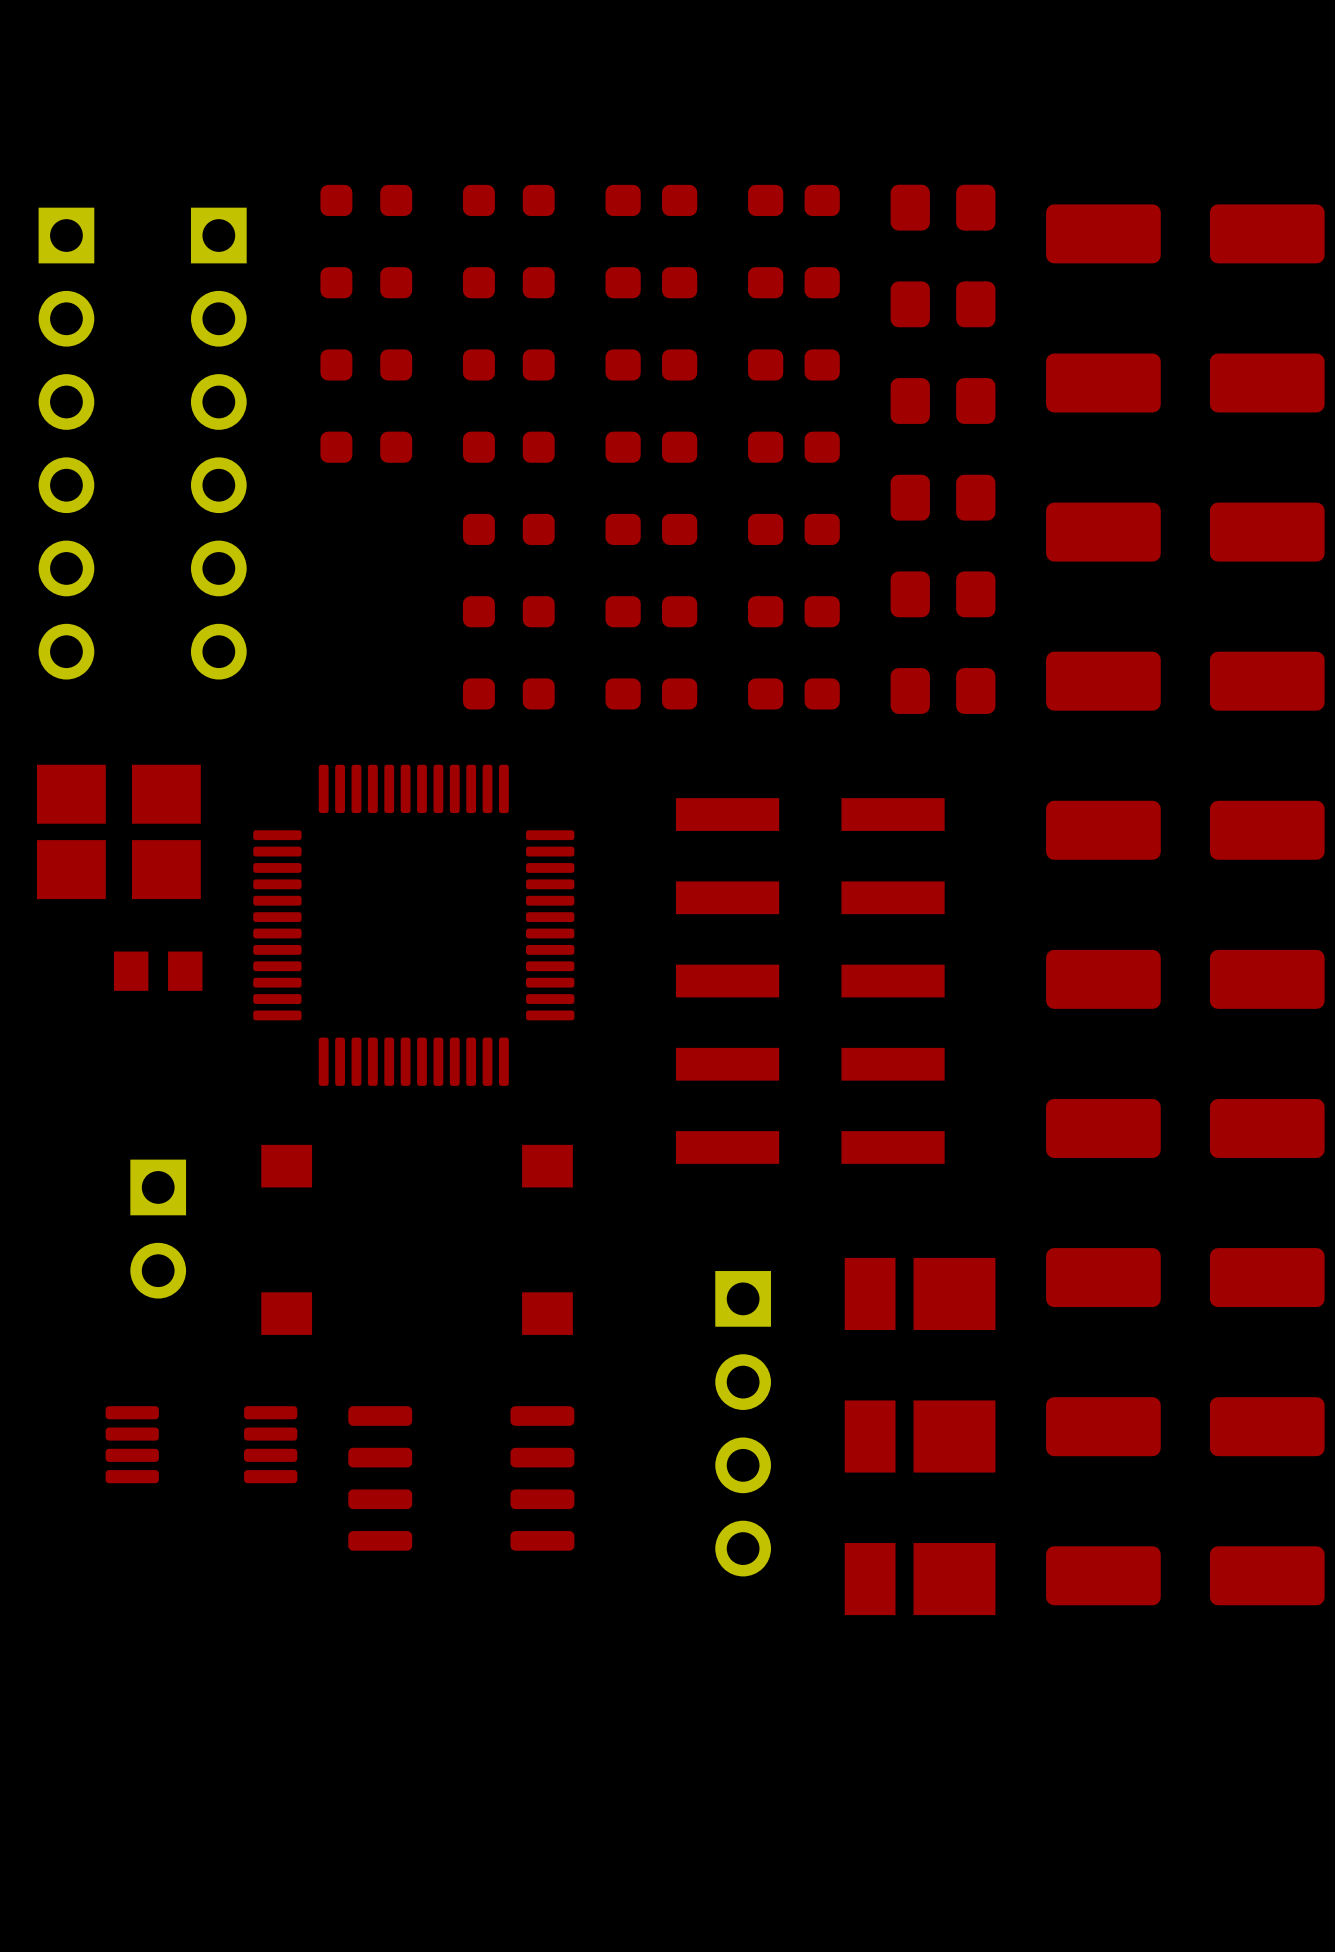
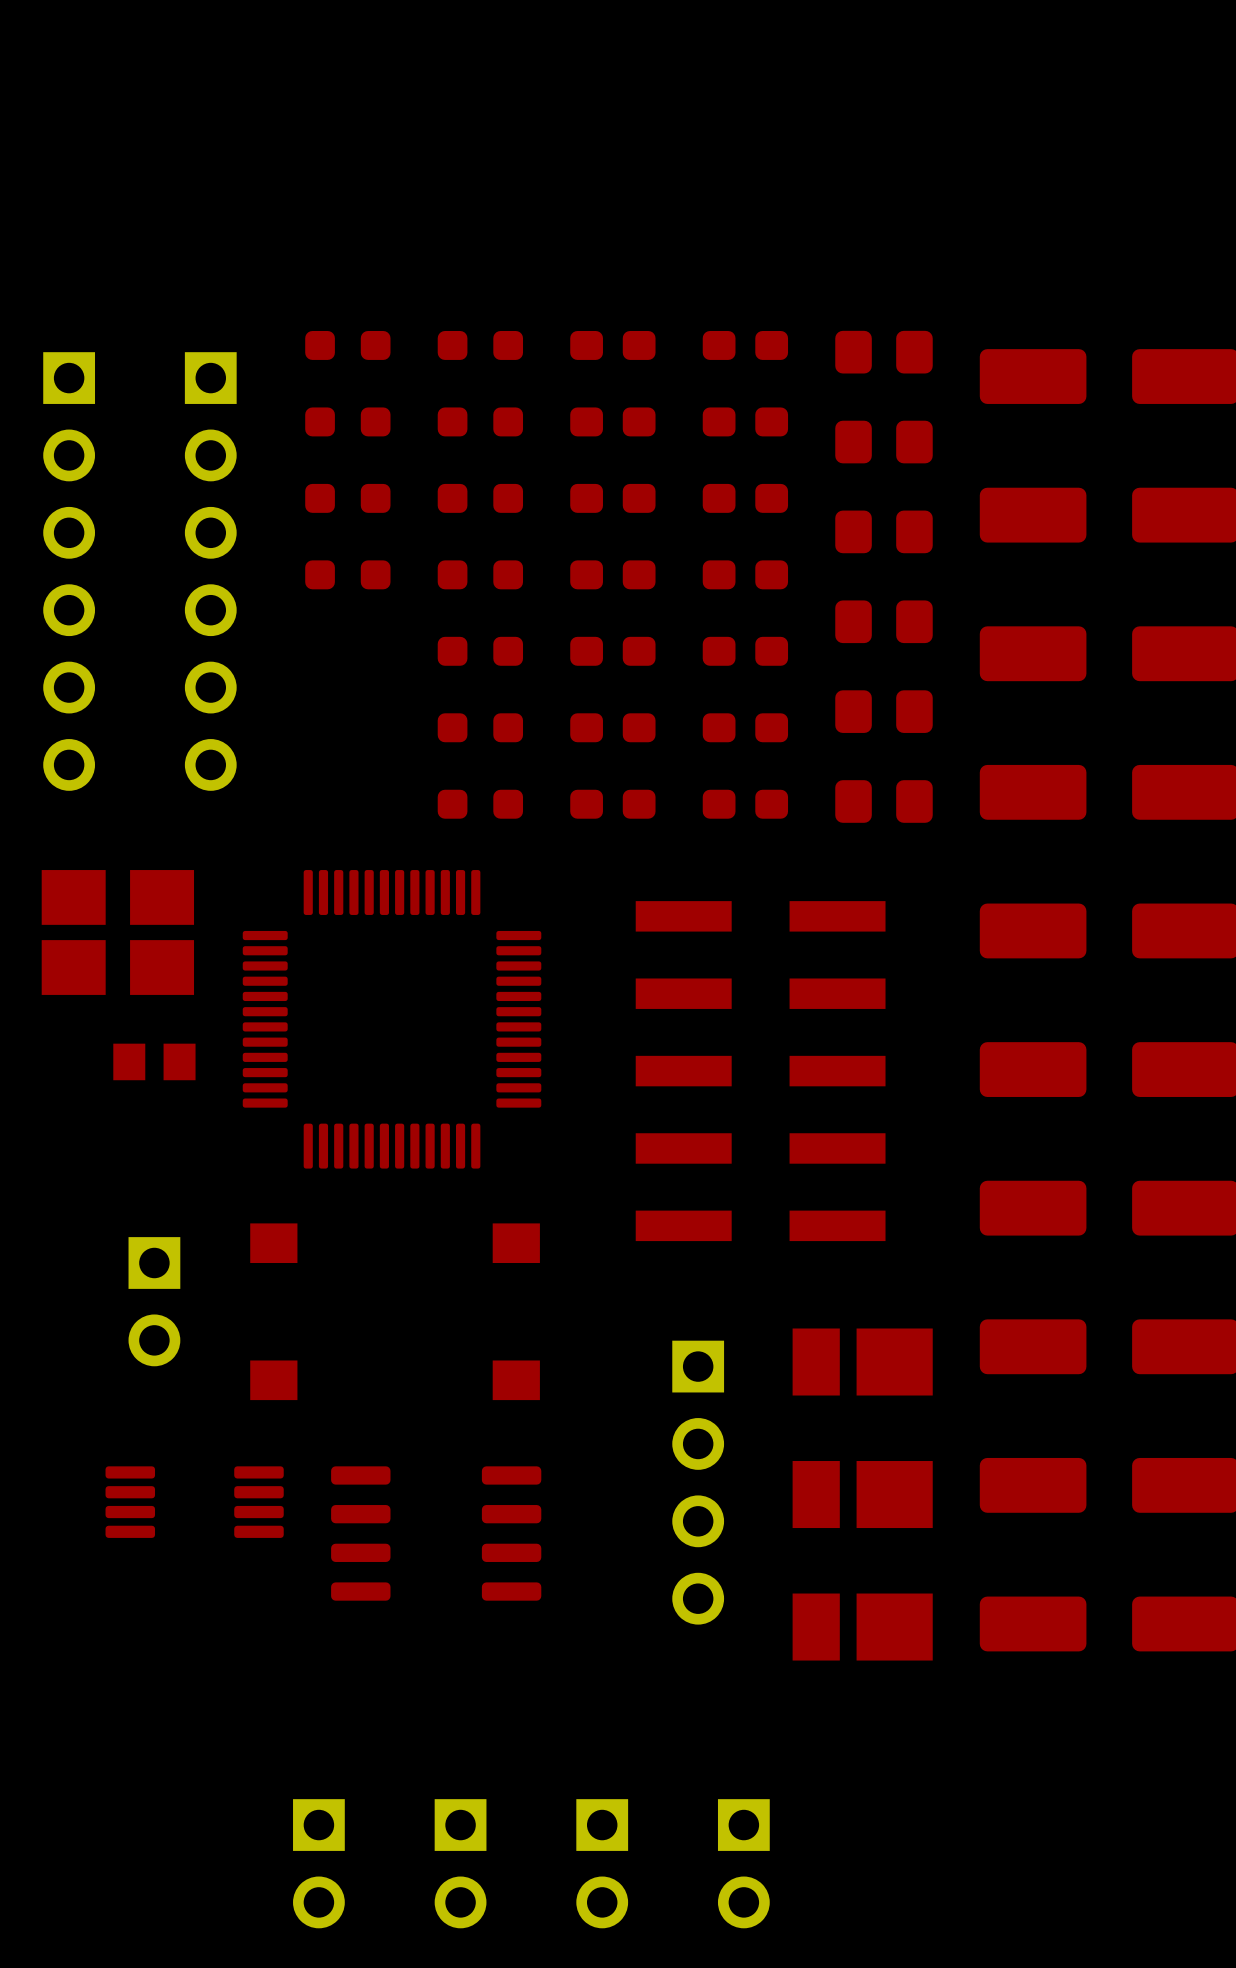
part: none -> (318, 1863)
part: none -> (460, 1863)
part: none -> (602, 1863)
part: none -> (743, 1863)

